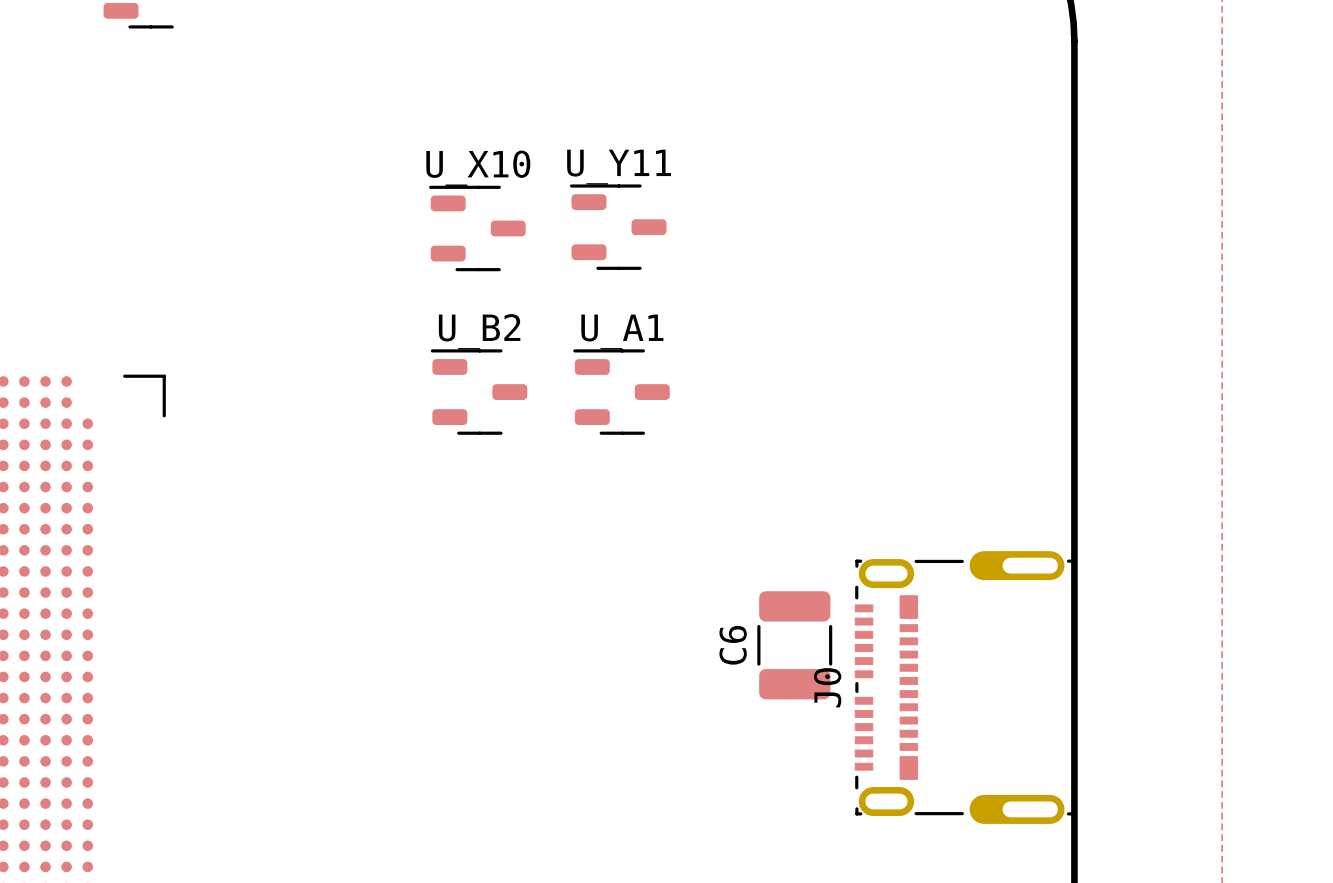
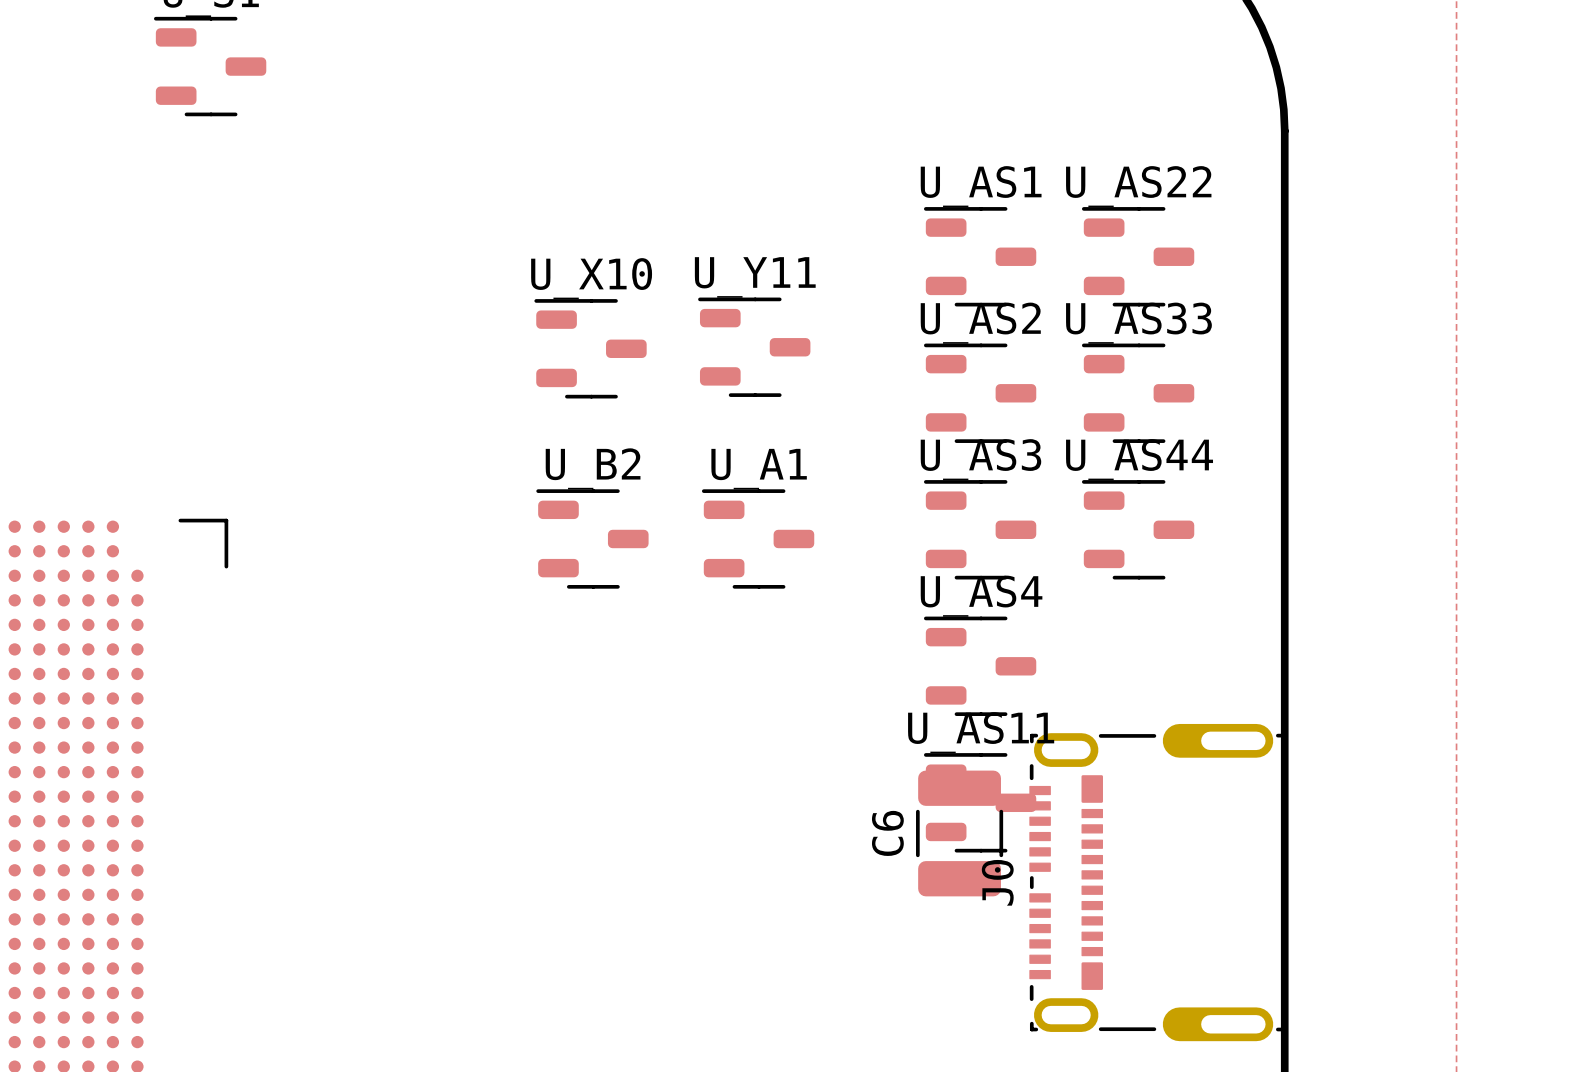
U_AS1: none -> (980, 256)
U_AS22: none -> (1138, 256)
U_AS2: none -> (980, 393)
U_AS33: none -> (1138, 393)
U_AS3: none -> (980, 529)
U_AS44: none -> (1138, 529)
U_AS4: none -> (980, 666)
U_AS11: none -> (980, 802)

